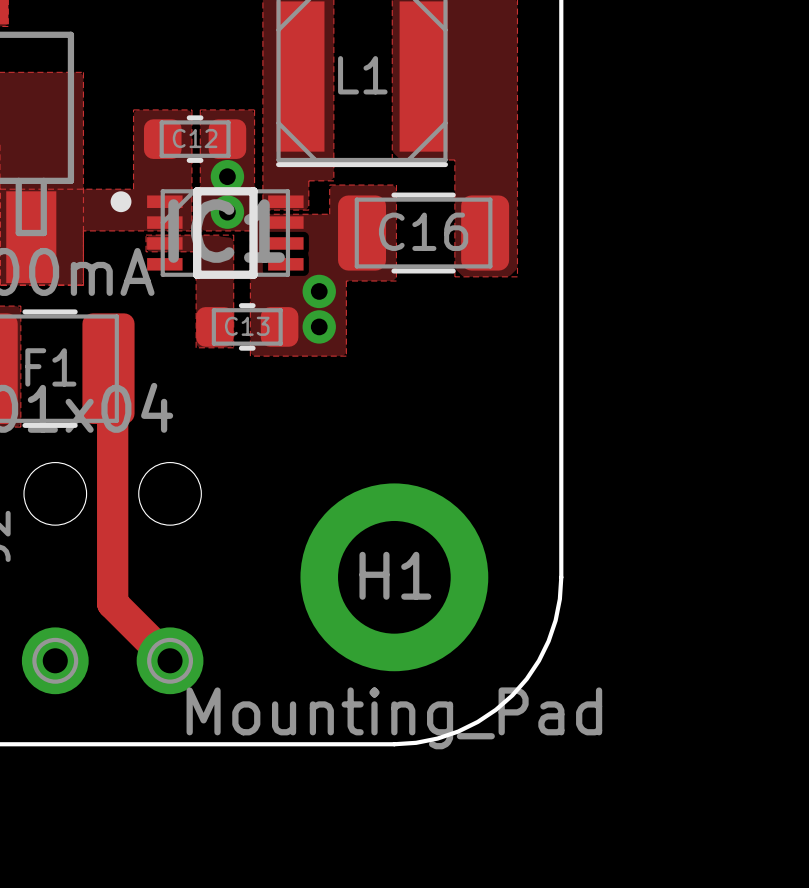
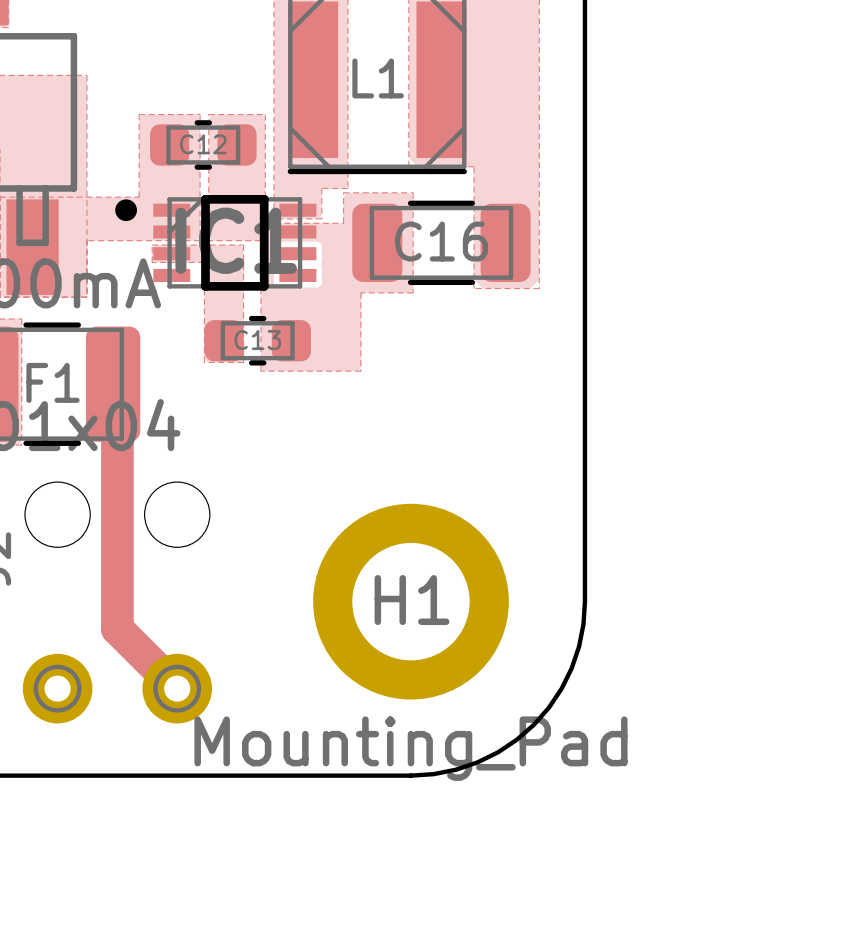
via: (227, 176) -> none
via: (227, 212) -> none
via: (319, 291) -> none
via: (319, 326) -> none

